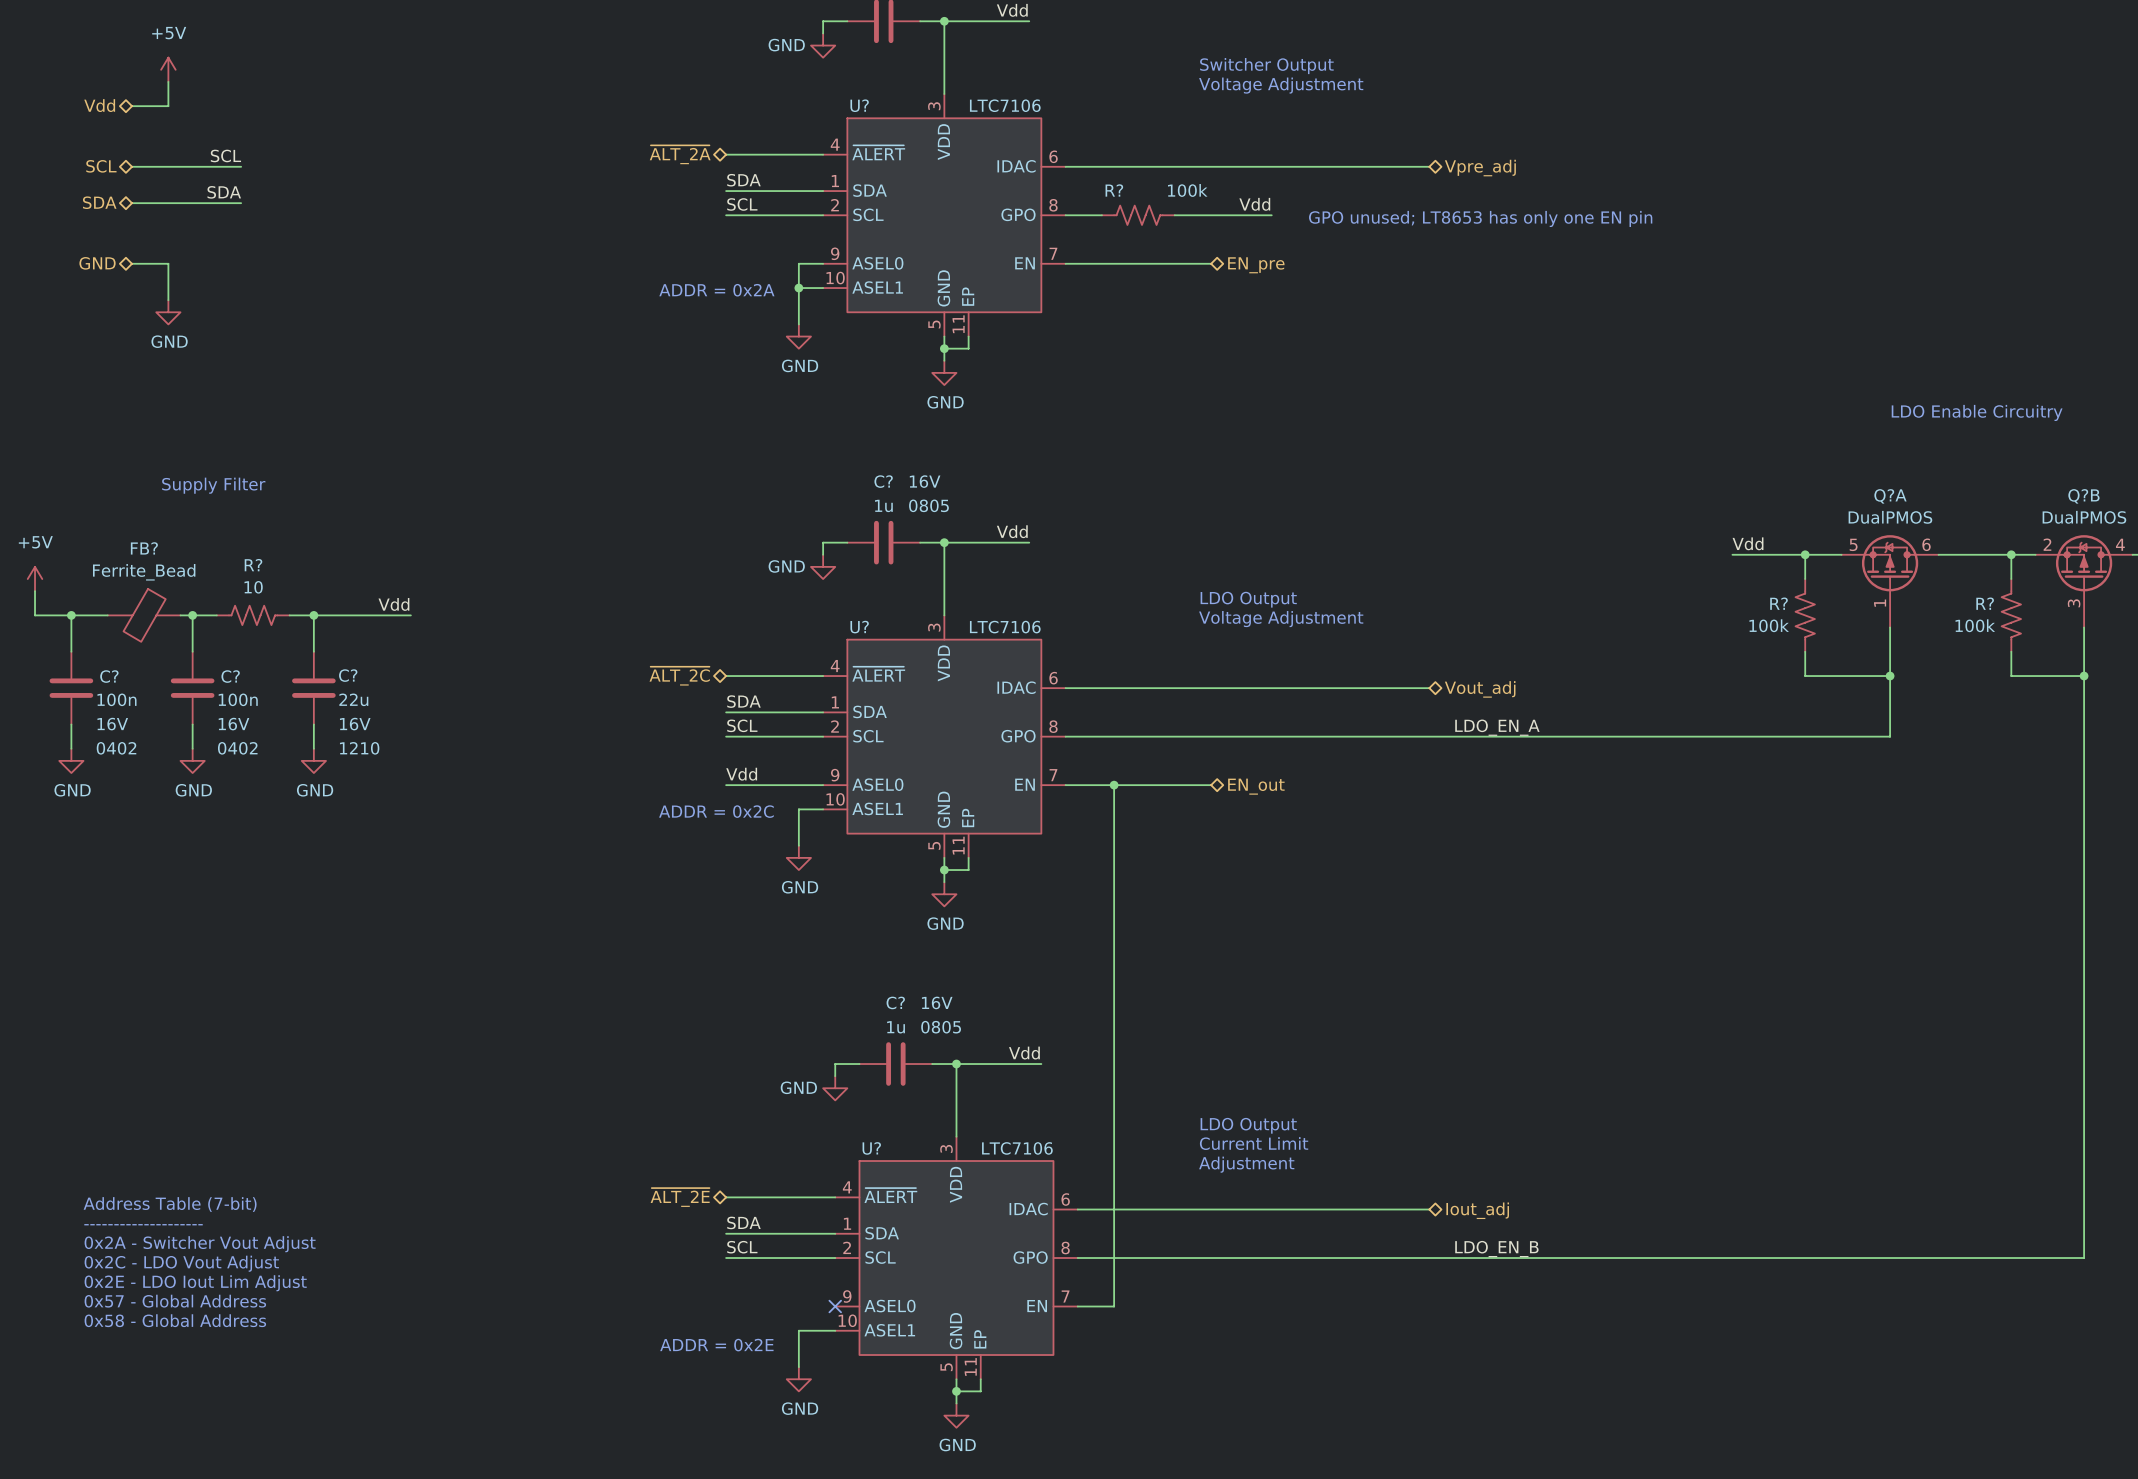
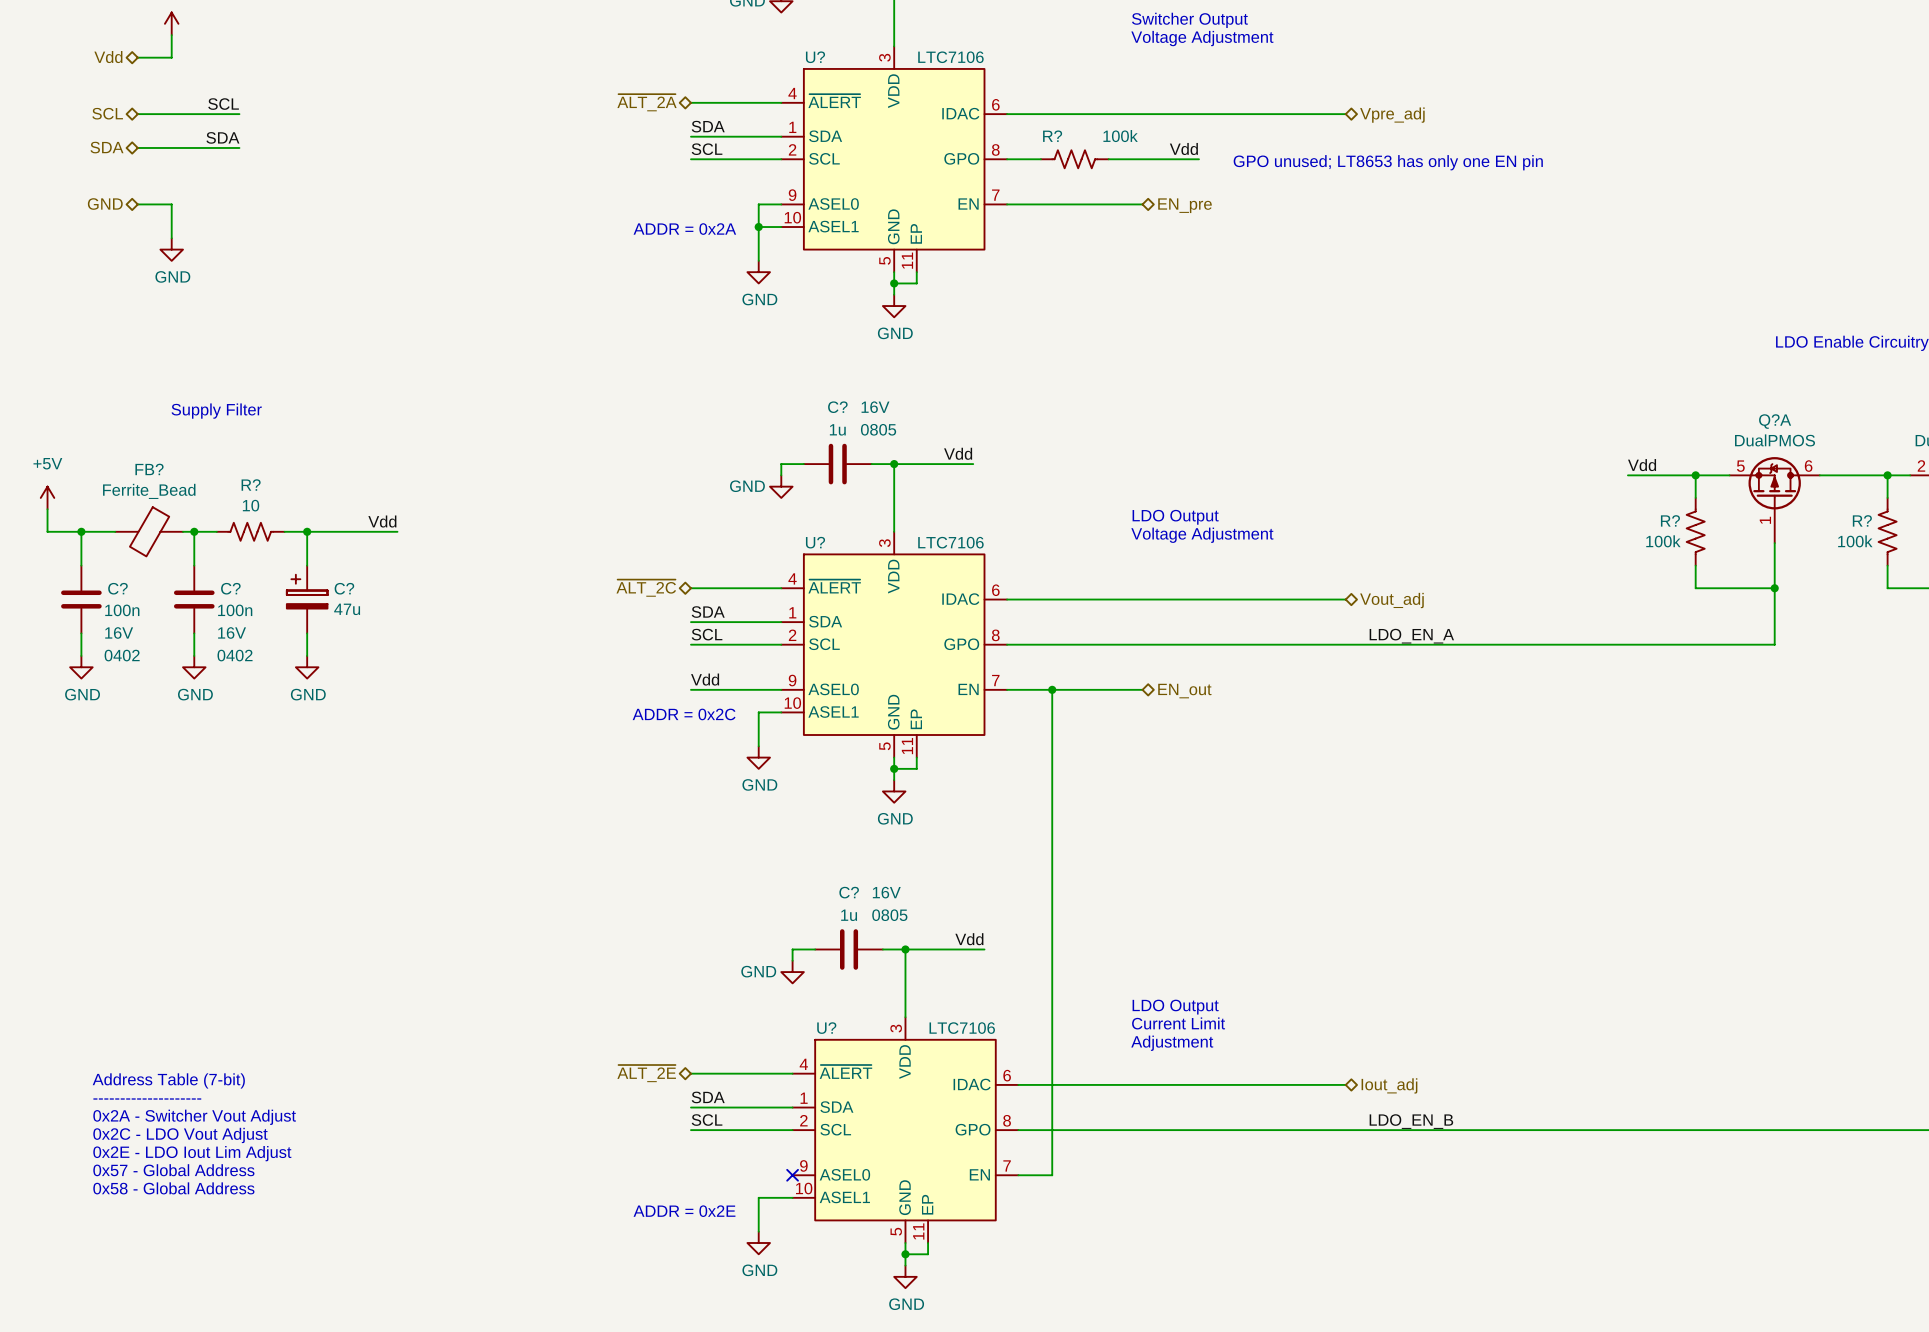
C? symbol: [292, 651, 336, 725] -> [286, 565, 328, 634]
C? value: 22u (353, 699) -> 47u (347, 609)
C? text: 16V (355, 724) -> none
C? text: 1210 (359, 748) -> none

